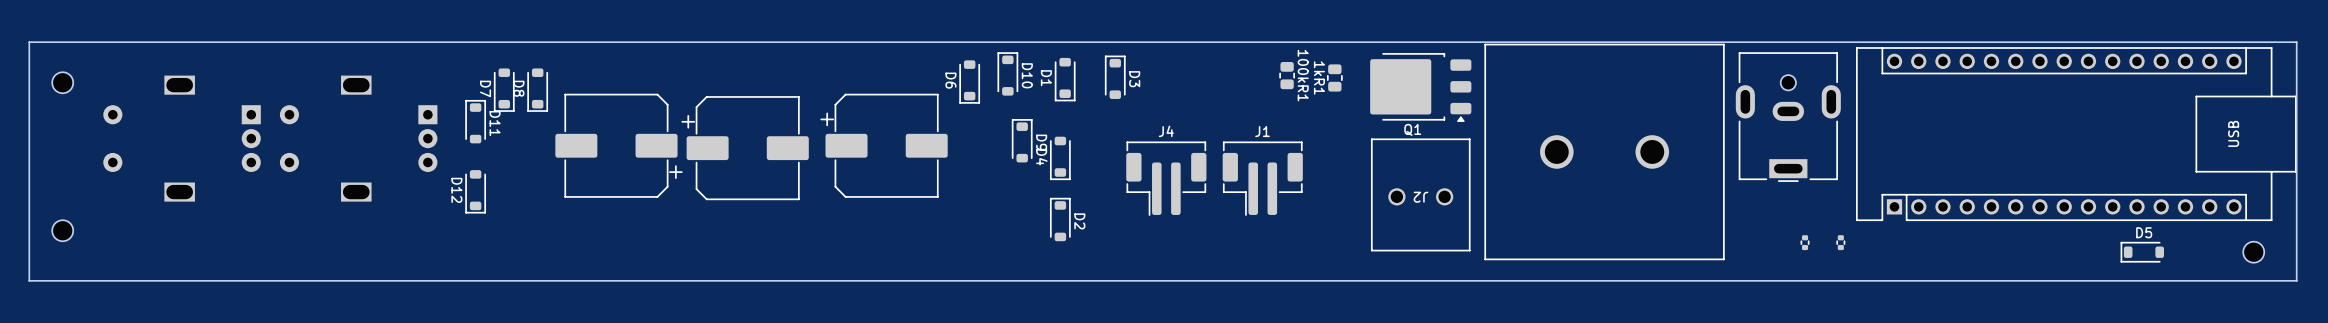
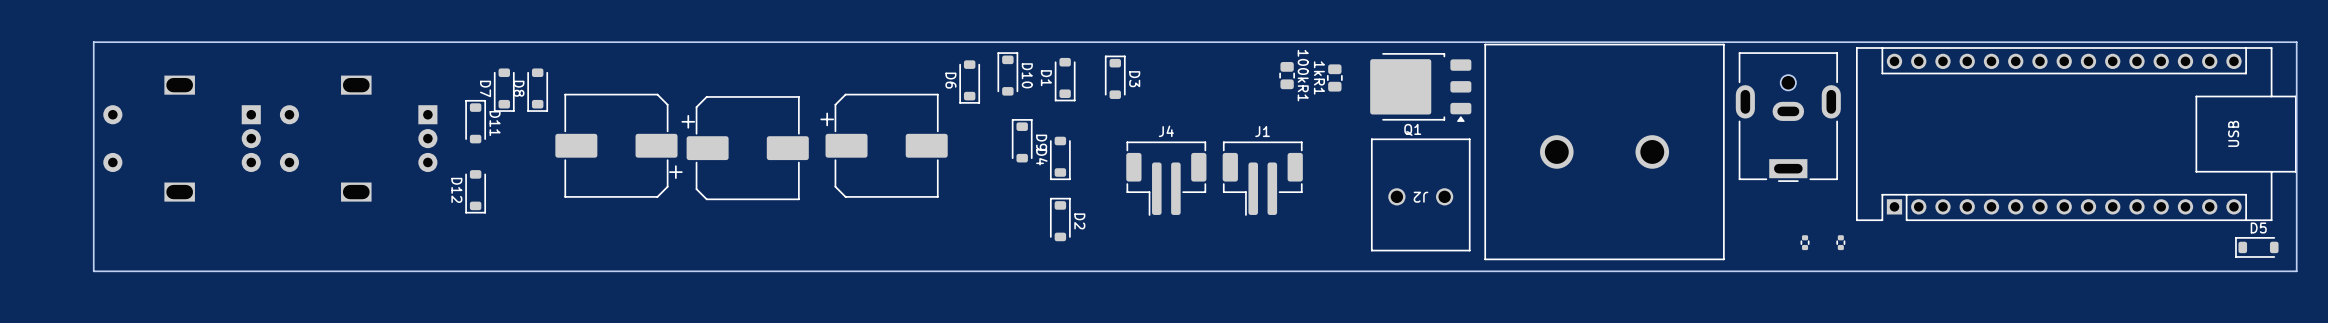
board edge: (93, 42) (29, 42) (29, 280) (2296, 280) (2296, 271) -> (93, 42) (93, 271) (2296, 271)
part: (62, 82) -> none
part: (62, 230) -> none
D5 position: (2142, 252) -> (2256, 247)
part: (2253, 252) -> none

